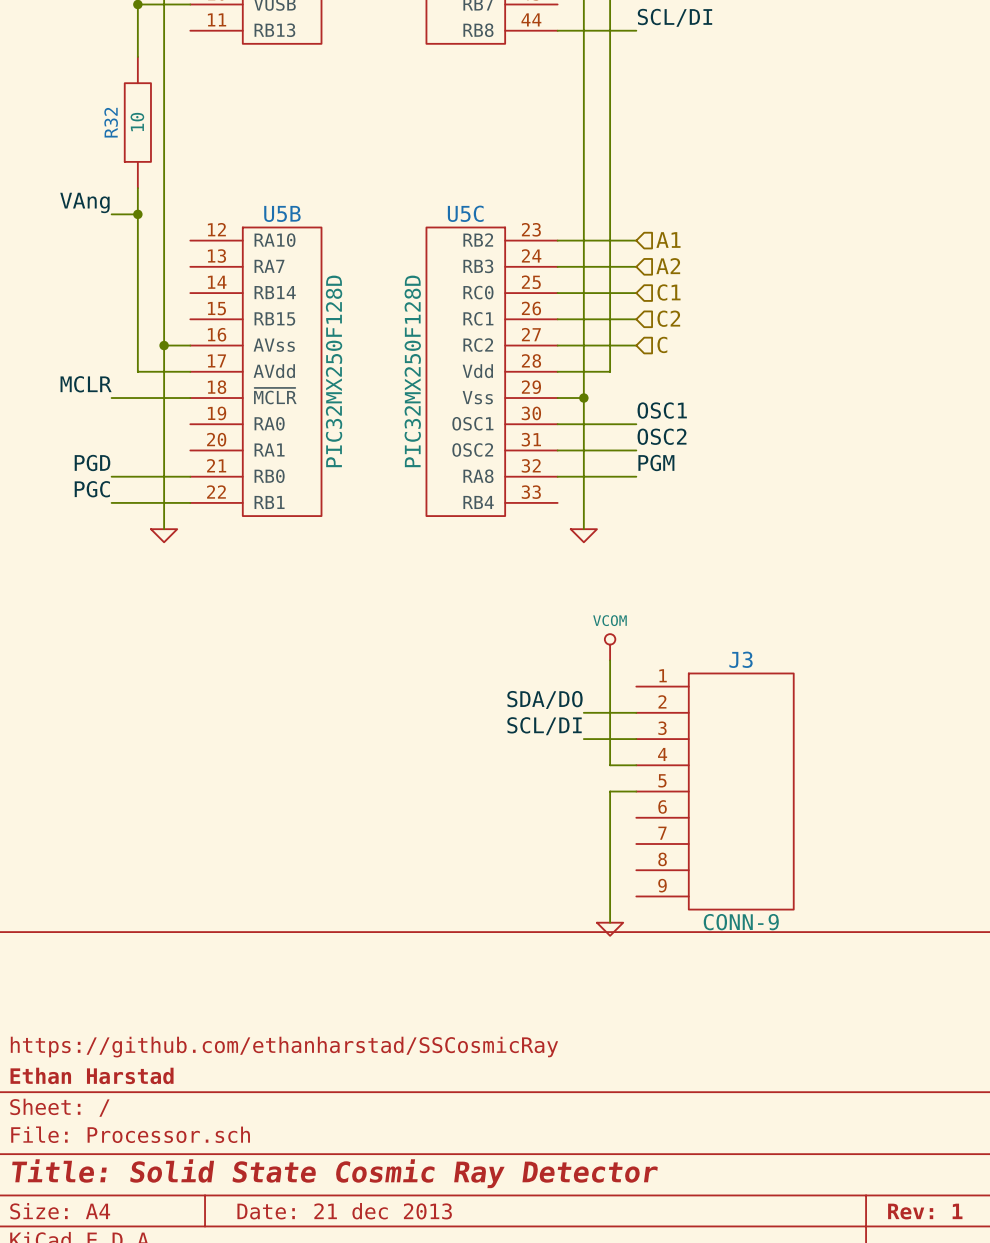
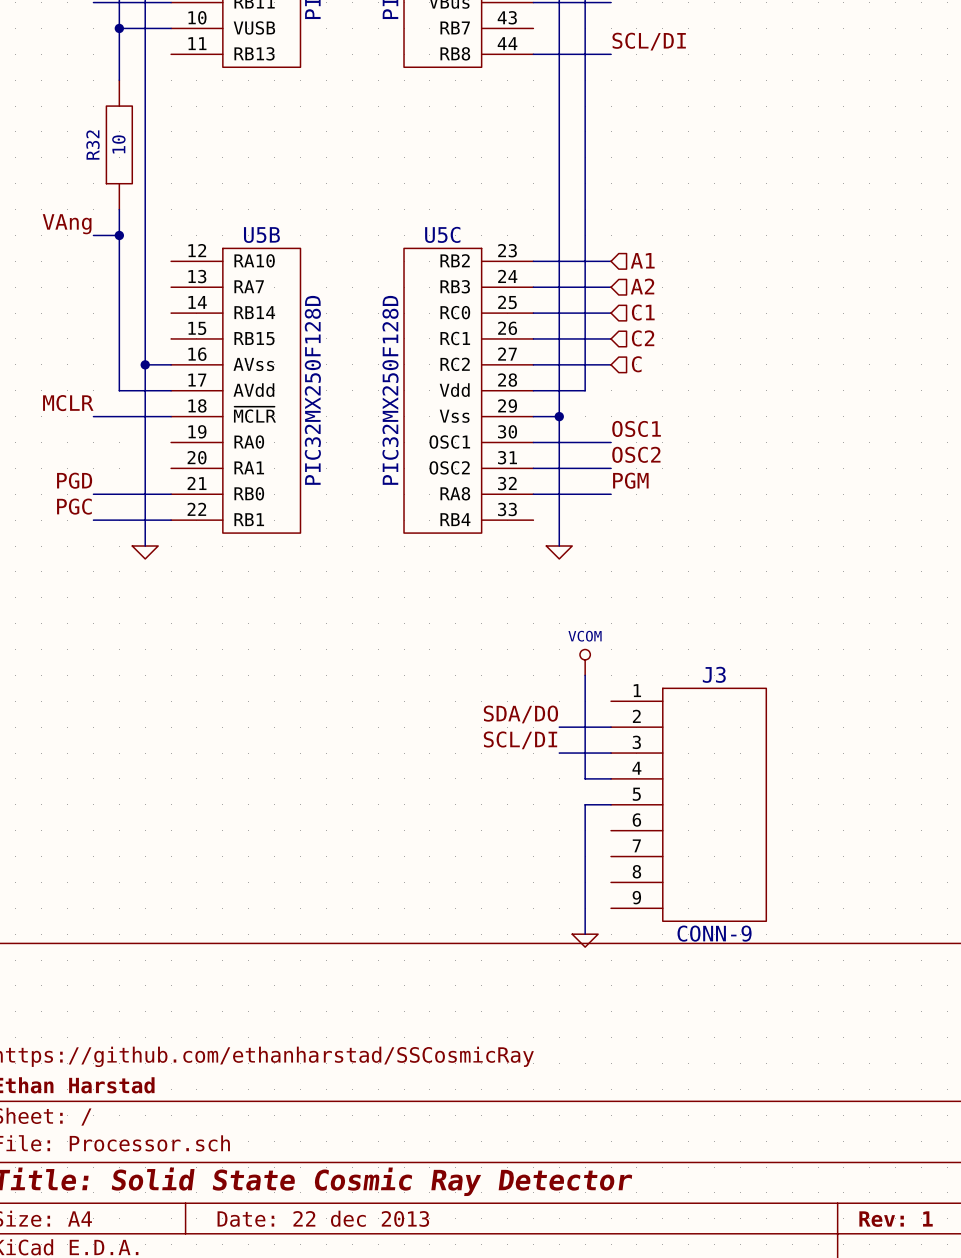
title block: Date: 21 dec 2013 (344, 1211) -> Date: 22 dec 2013 (323, 1218)

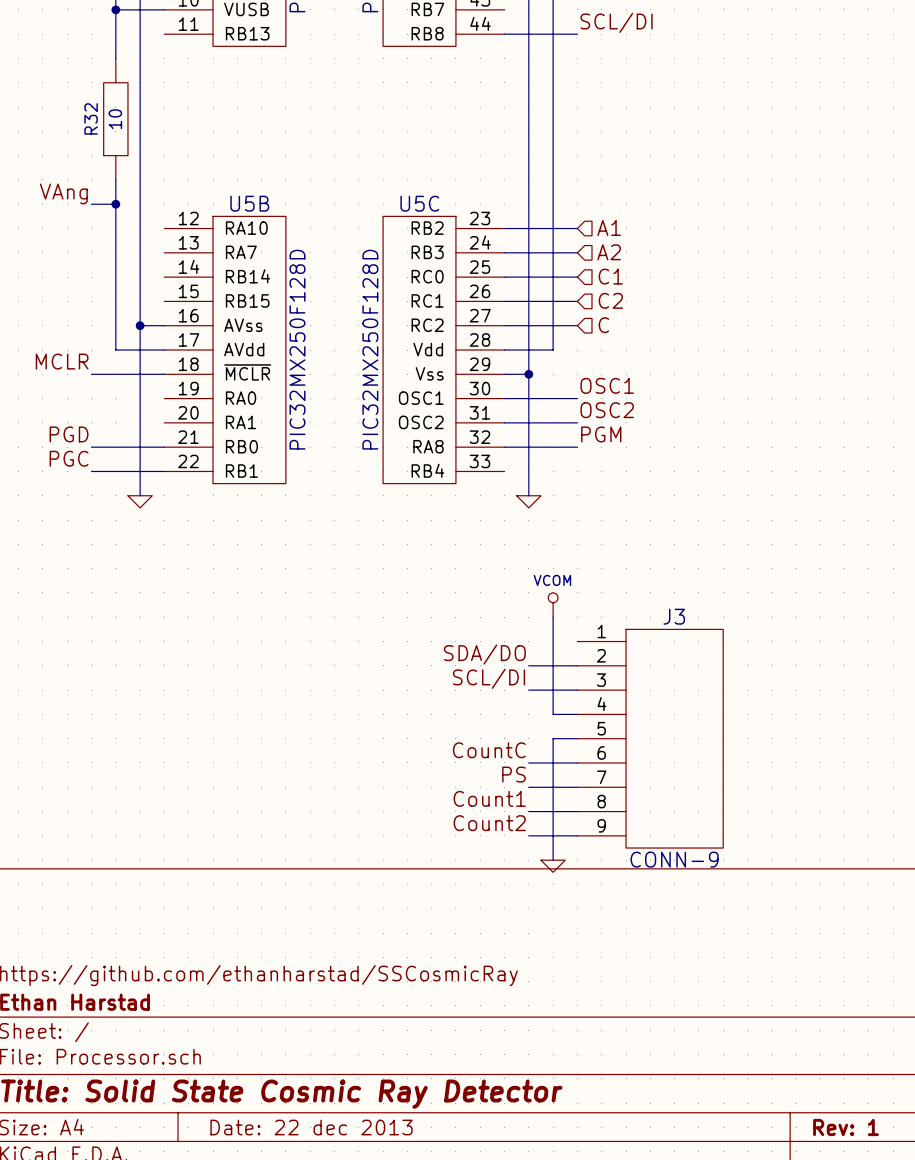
label: none -> CountC (489, 750)
wire: none -> (528, 762) (577, 762)
label: none -> PS (513, 774)
wire: none -> (528, 787) (577, 787)
label: none -> Count1 (489, 798)
wire: none -> (528, 811) (577, 811)
label: none -> Count2 (489, 823)
wire: none -> (528, 835) (577, 835)

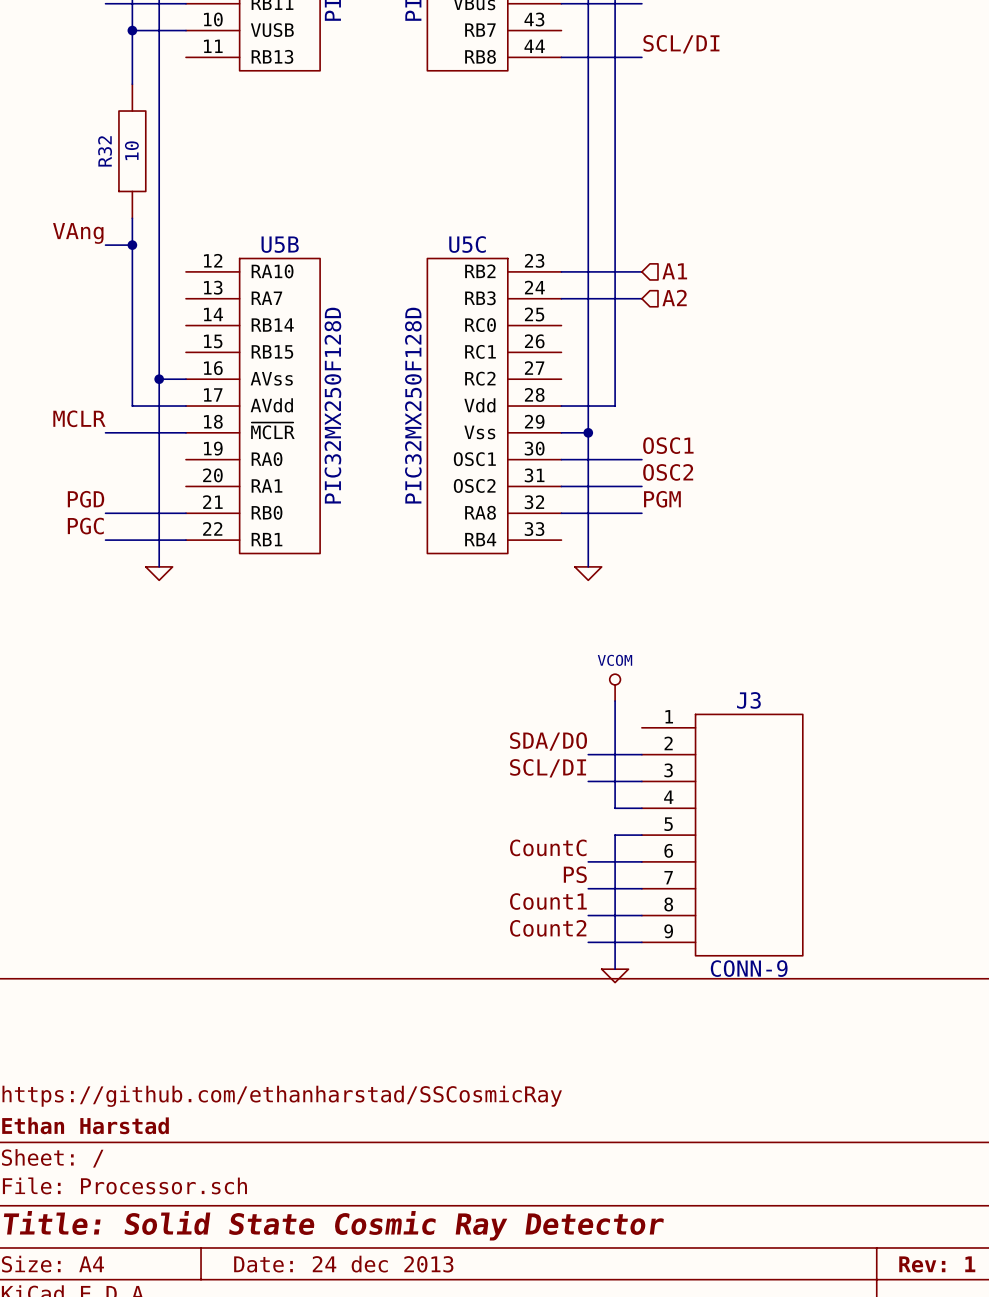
hierarchical label: C1 (610, 276) -> none
wire: (504, 277) (577, 277) -> none
hierarchical label: C2 (610, 300) -> none
wire: (504, 301) (577, 301) -> none
wire: (504, 325) (577, 325) -> none
hierarchical label: C (603, 325) -> none
title block: Date: 22 dec 2013 (311, 1127) -> Date: 24 dec 2013 (343, 1264)

